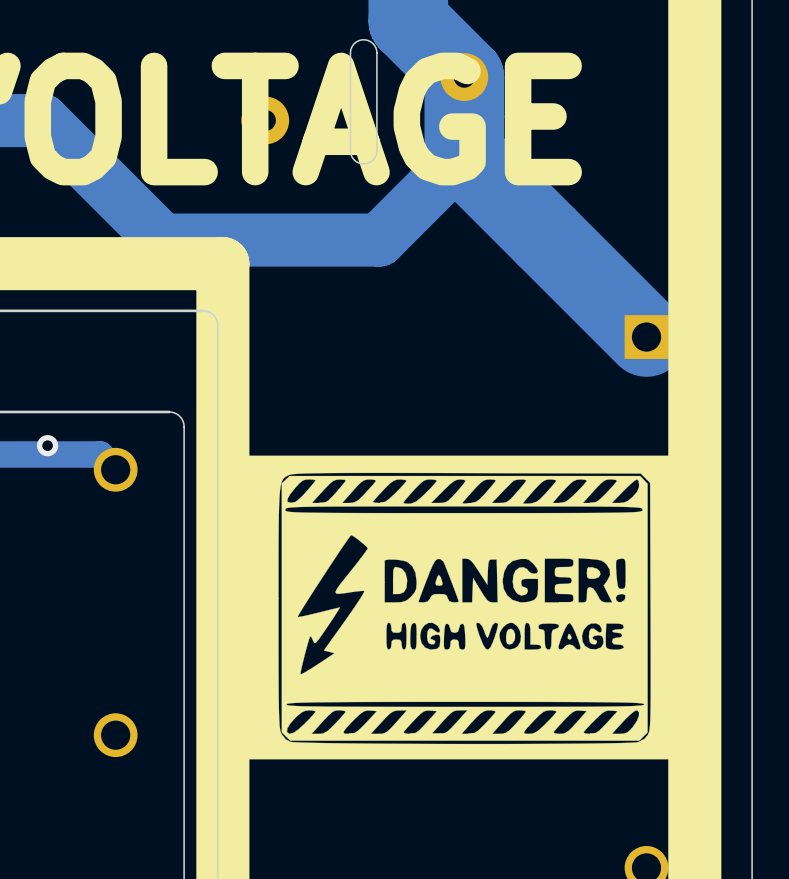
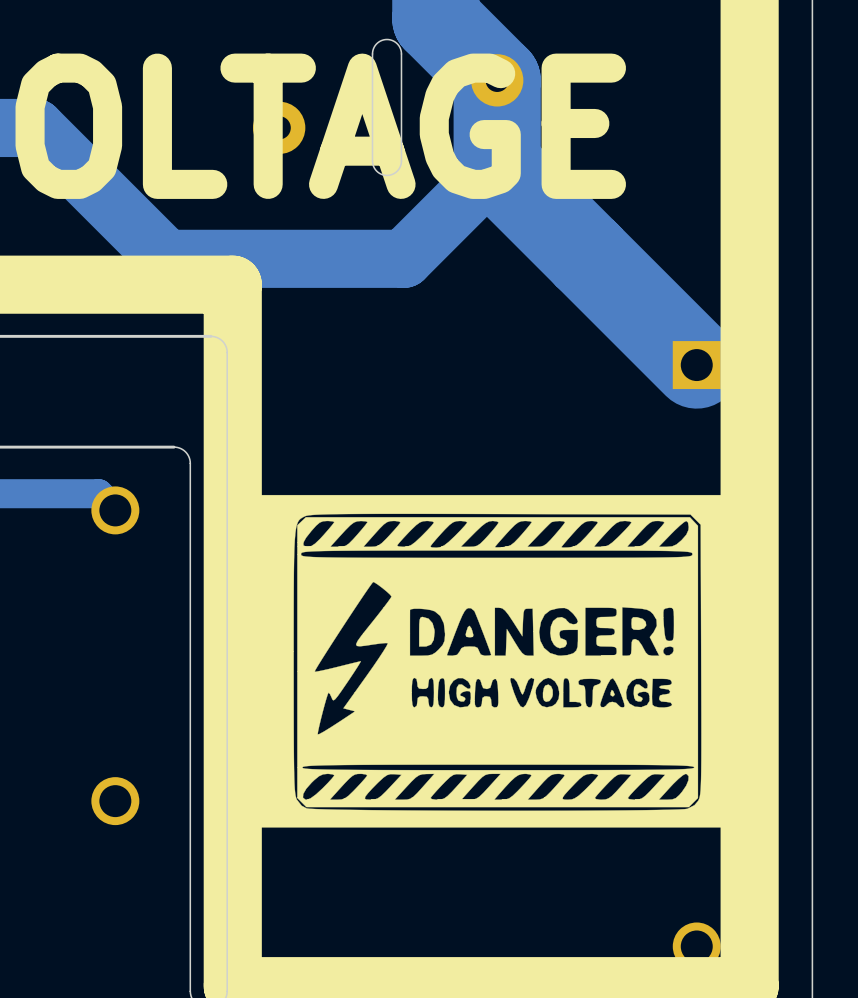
via: (47, 445) -> none

